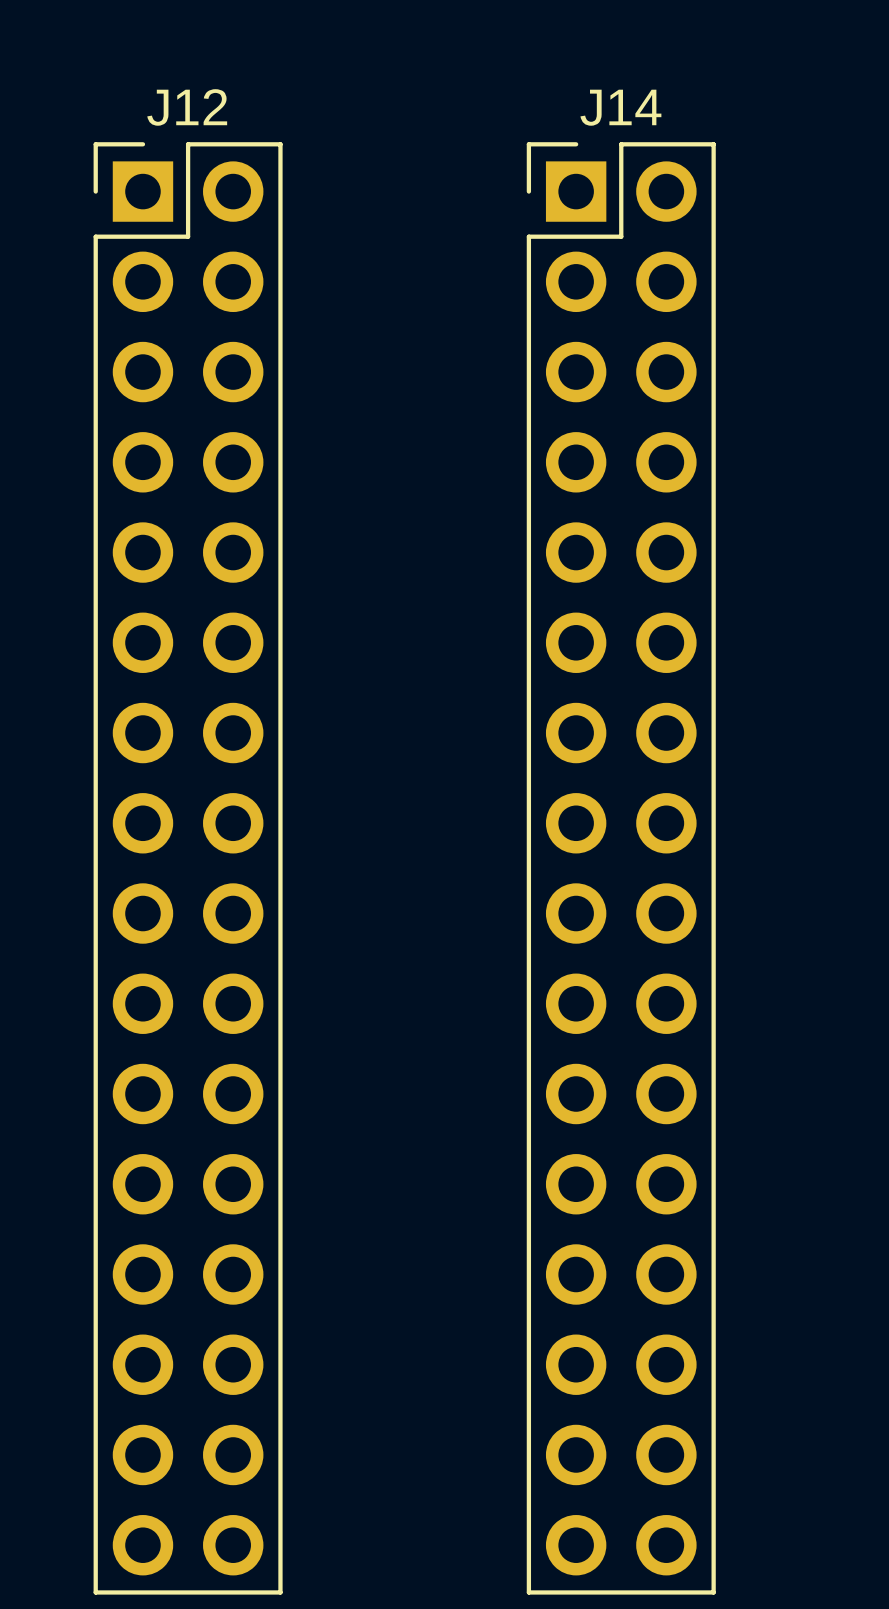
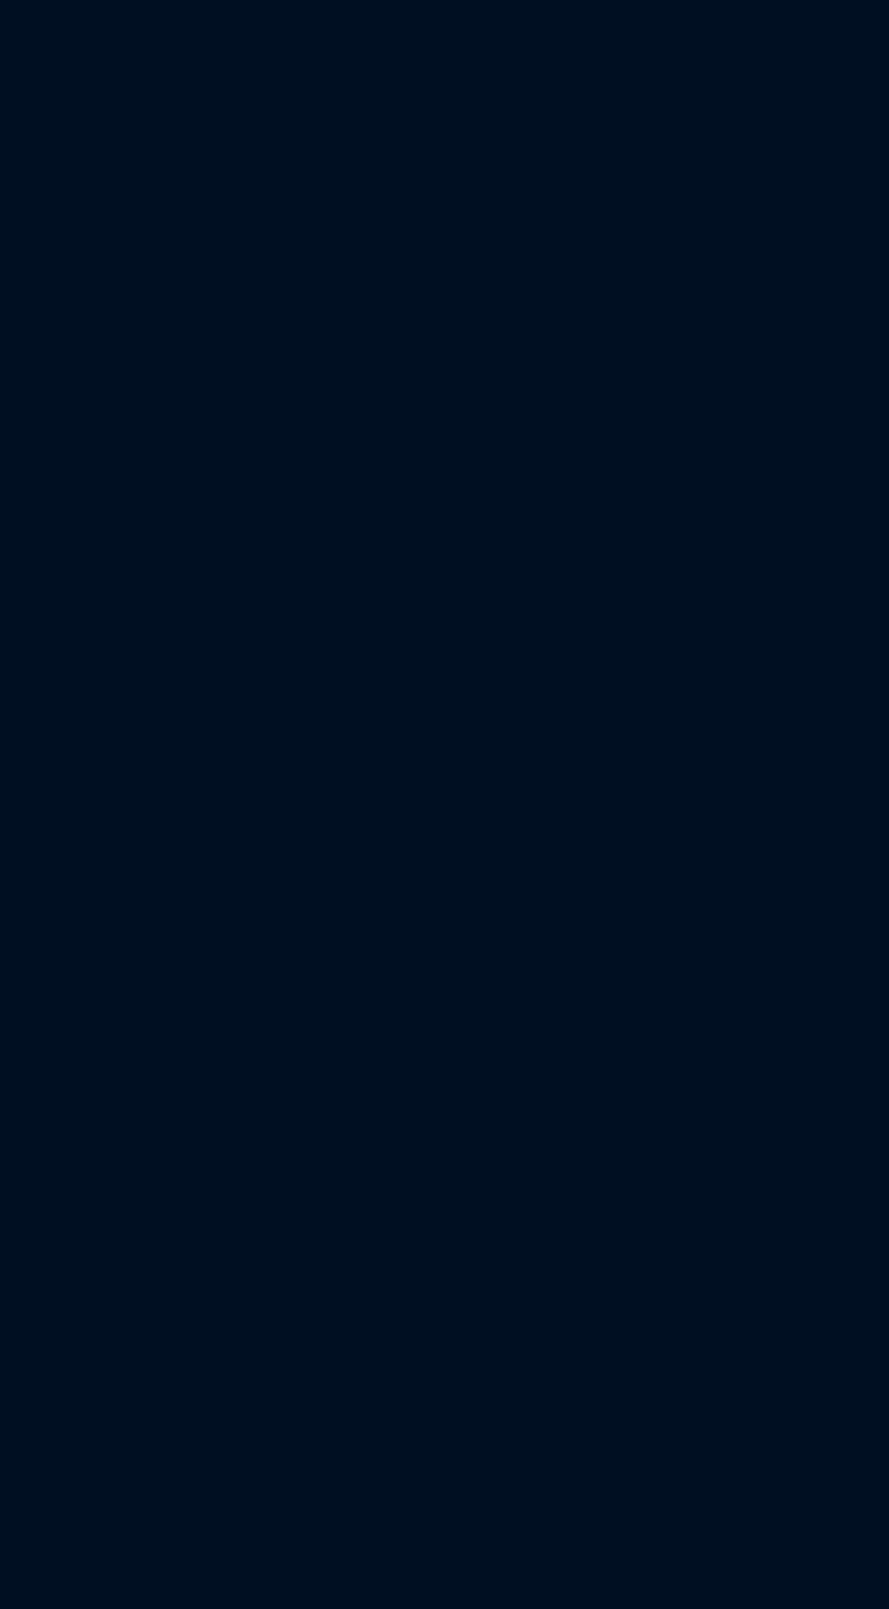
J12: (188, 868) -> none
J14: (621, 868) -> none

